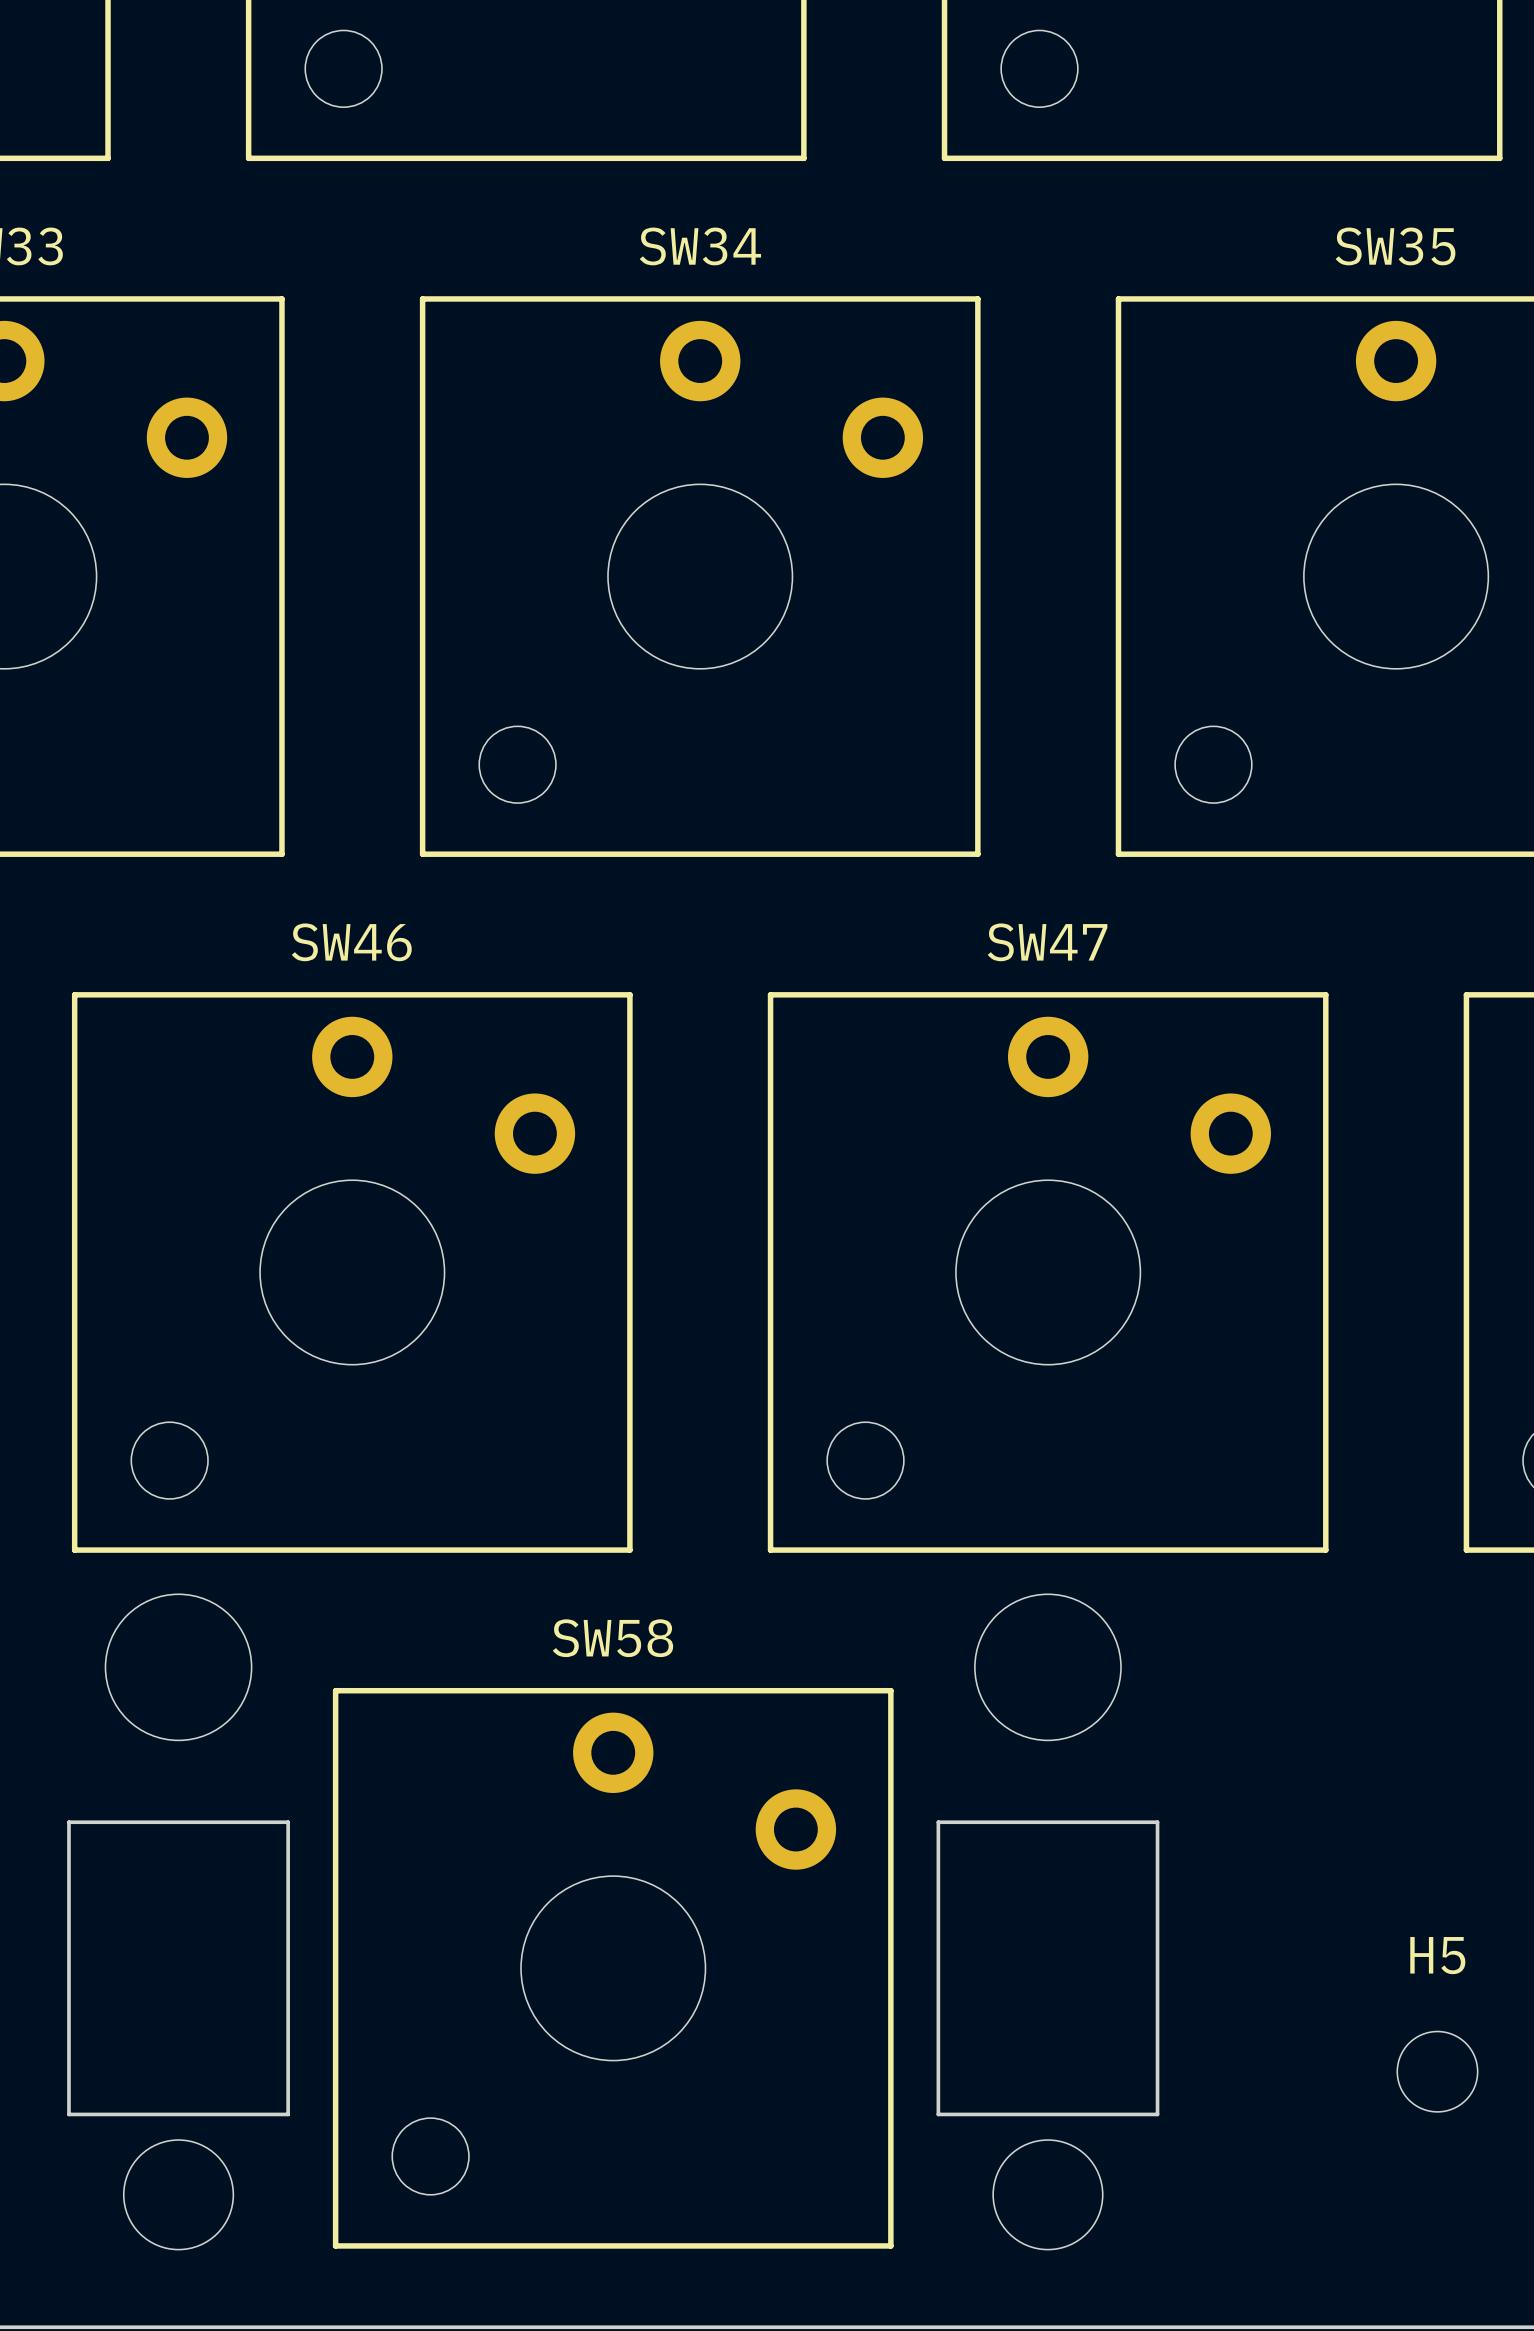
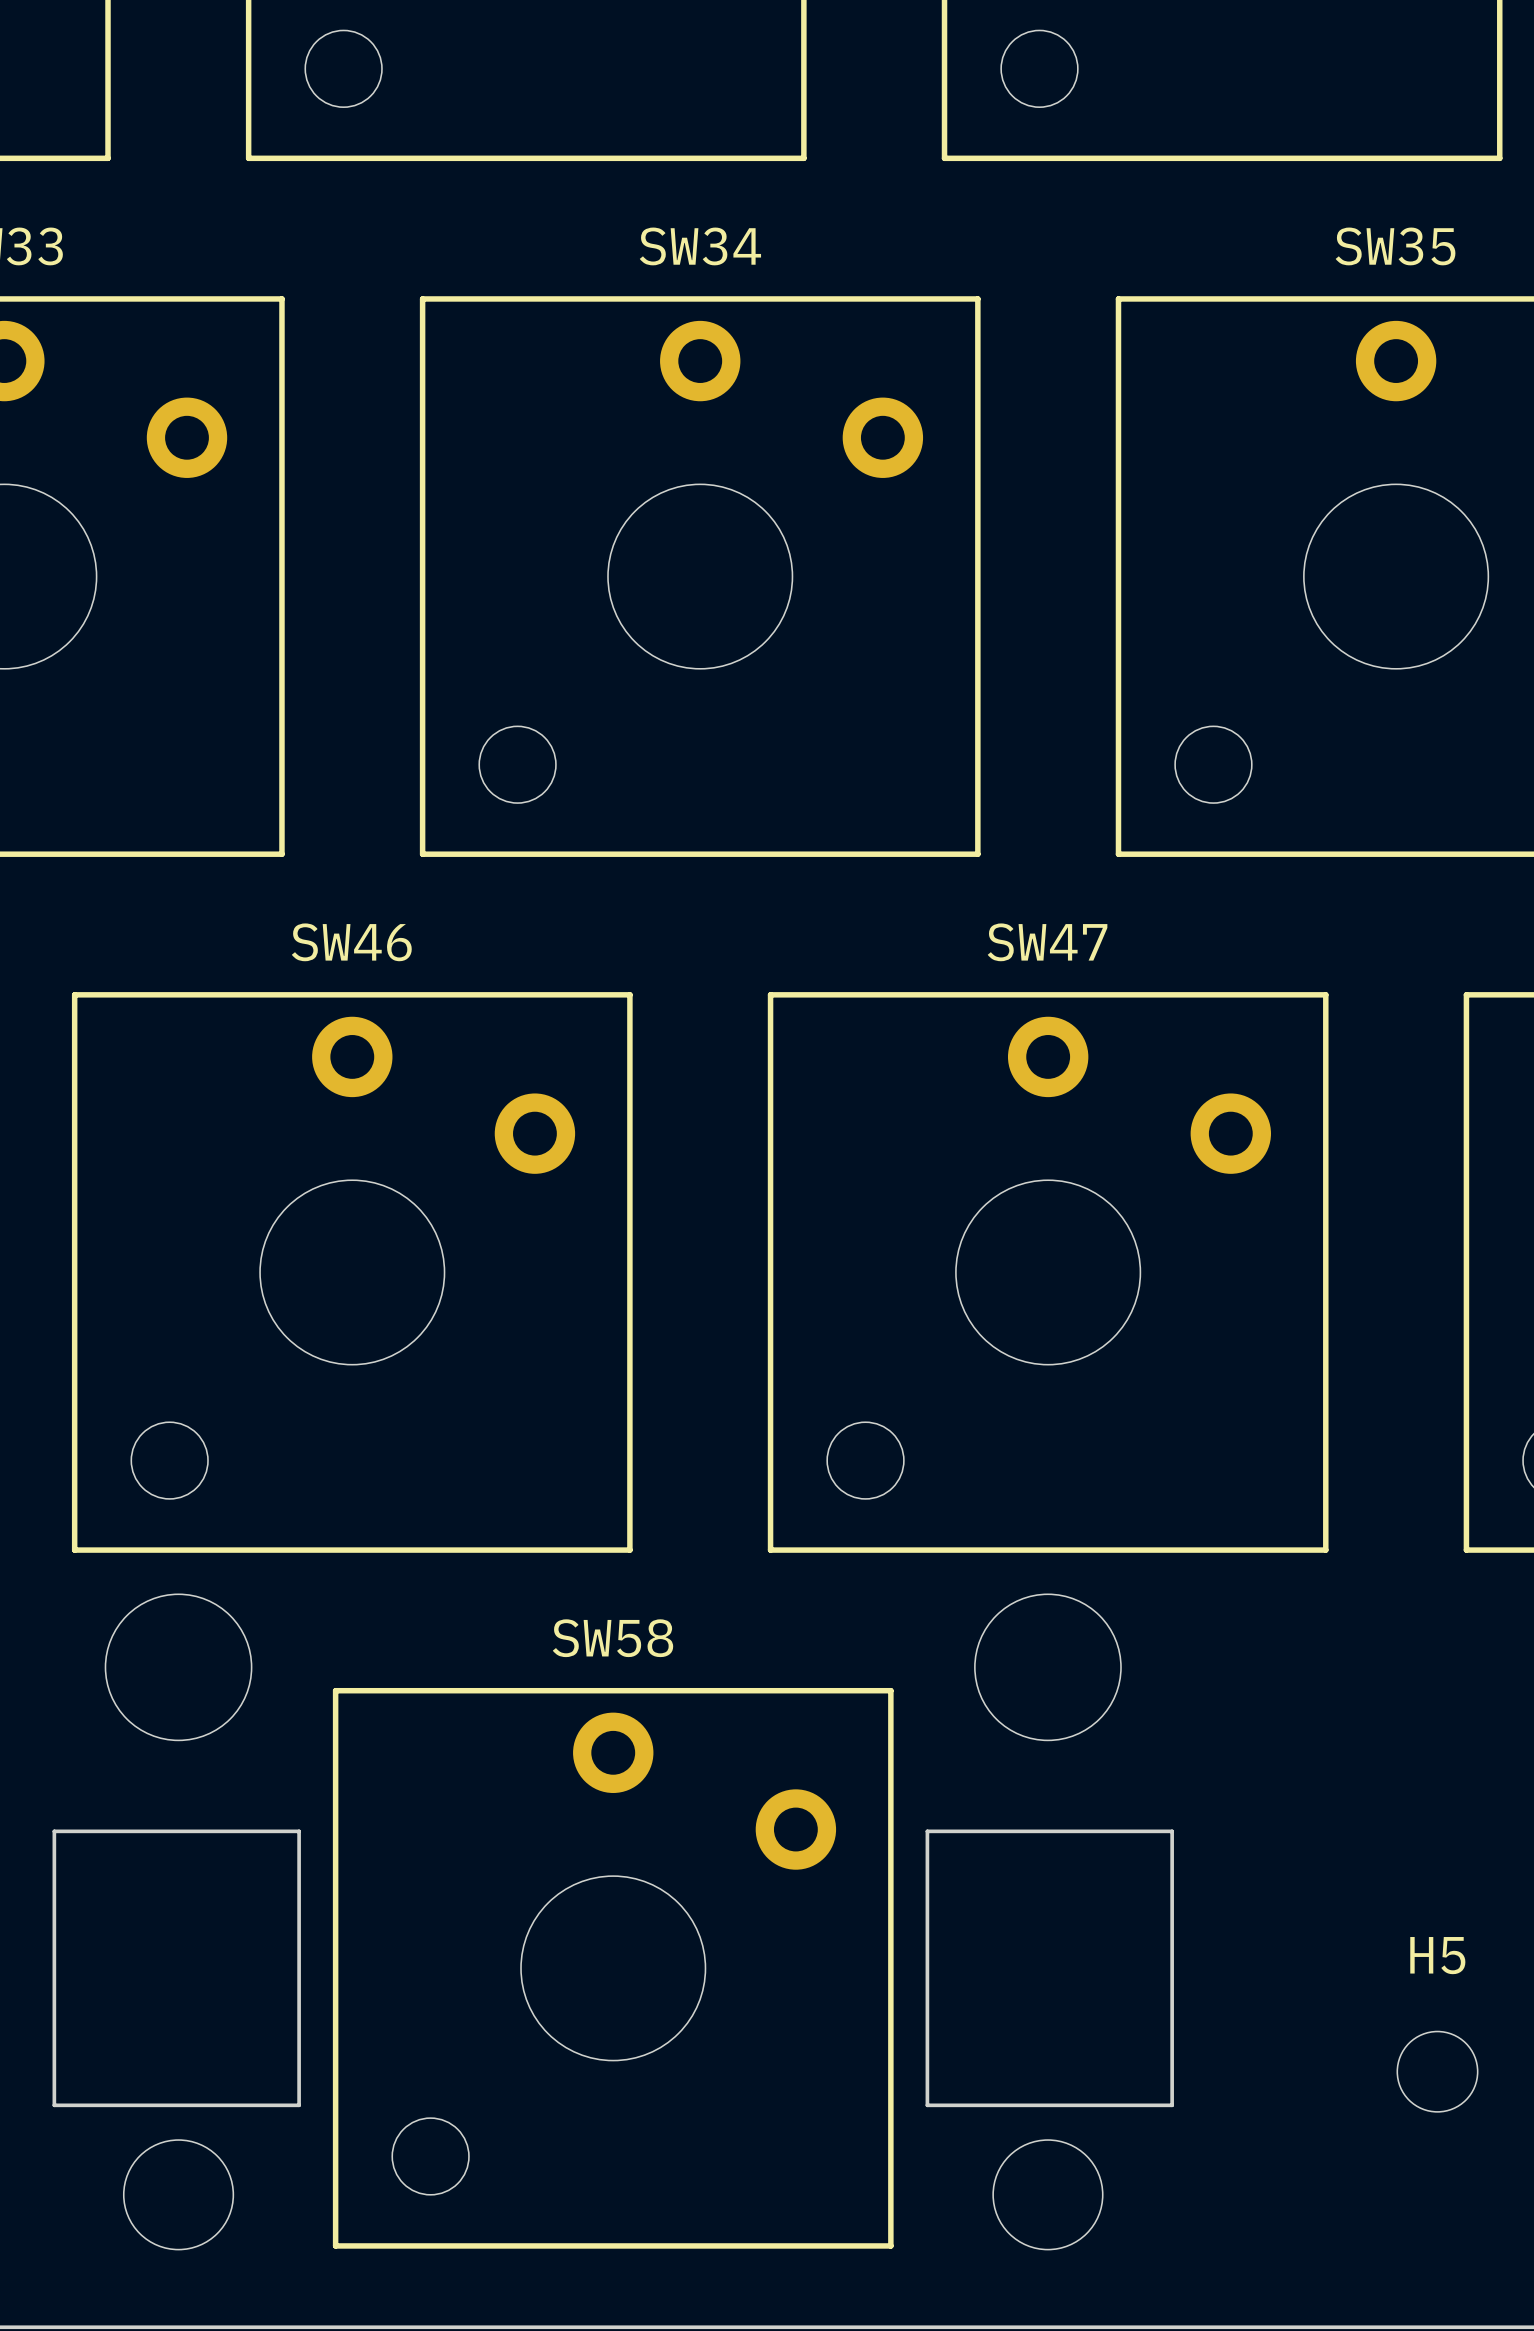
board edge: (68, 1822) (68, 2114) (288, 2114) (288, 1822) (68, 1822) -> (54, 1831) (54, 2105) (299, 2105) (299, 1831) (54, 1831)
board edge: (938, 1822) (1157, 1822) (1157, 2114) (938, 2114) (938, 1822) -> (927, 1831) (927, 2105) (1172, 2105) (1172, 1831) (927, 1831)

